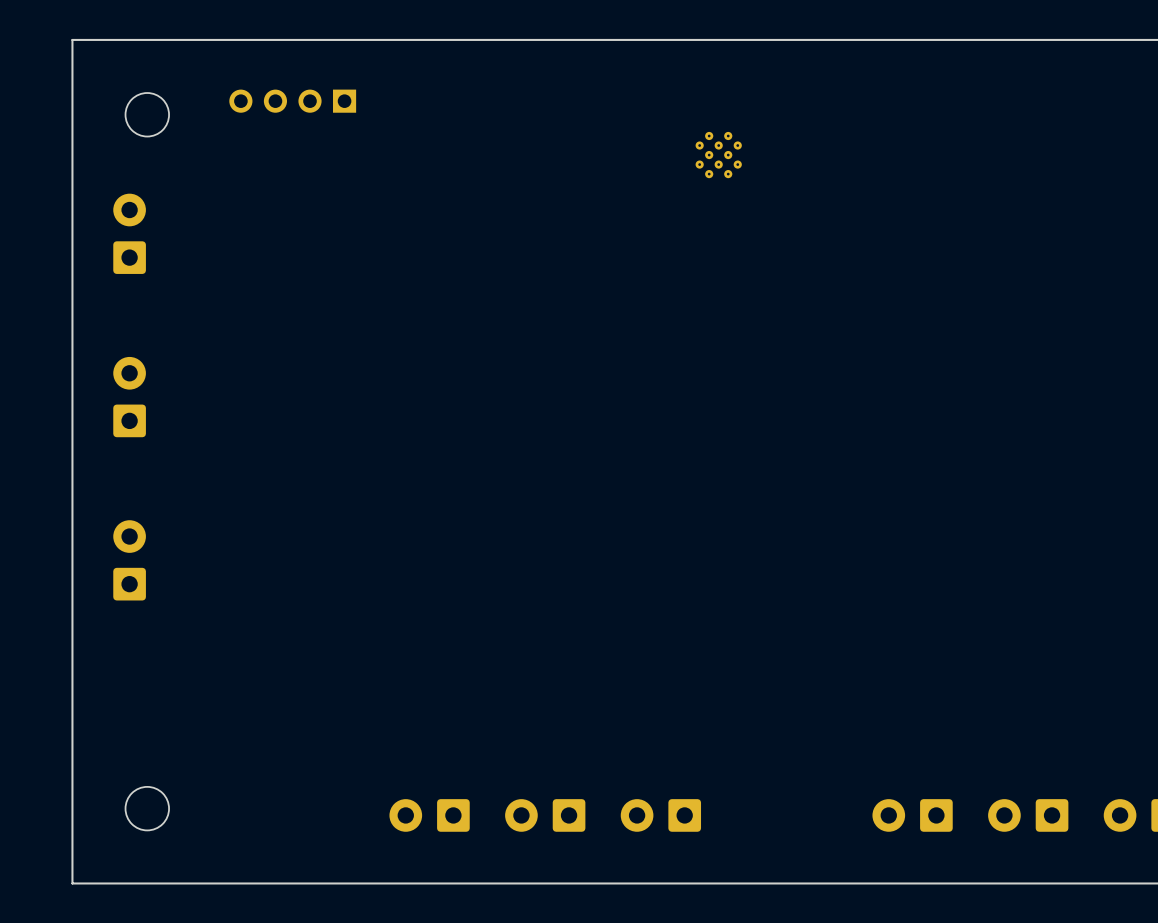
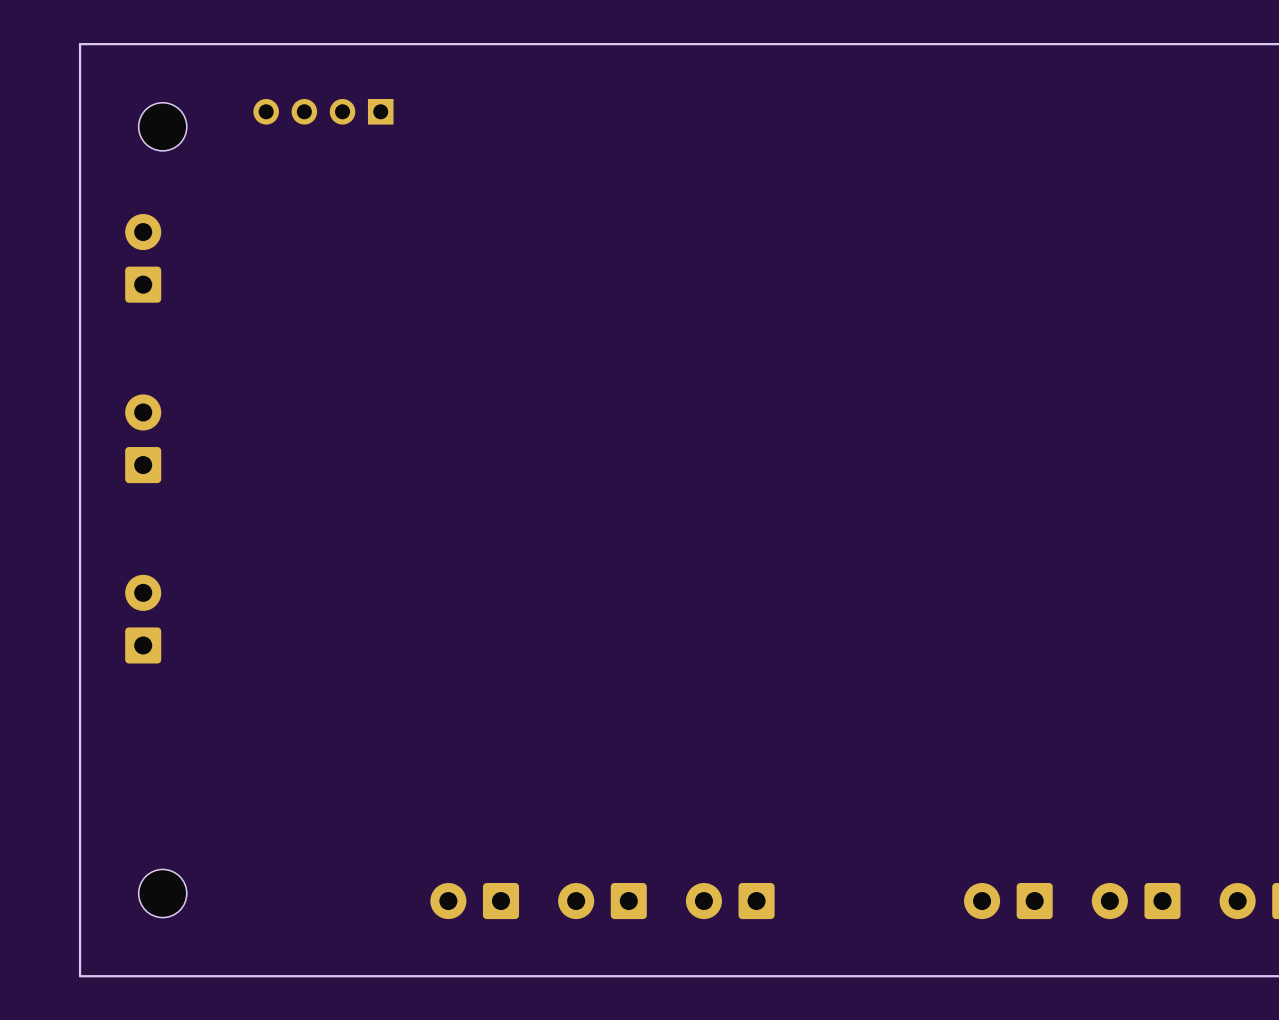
part: (718, 155) -> none

